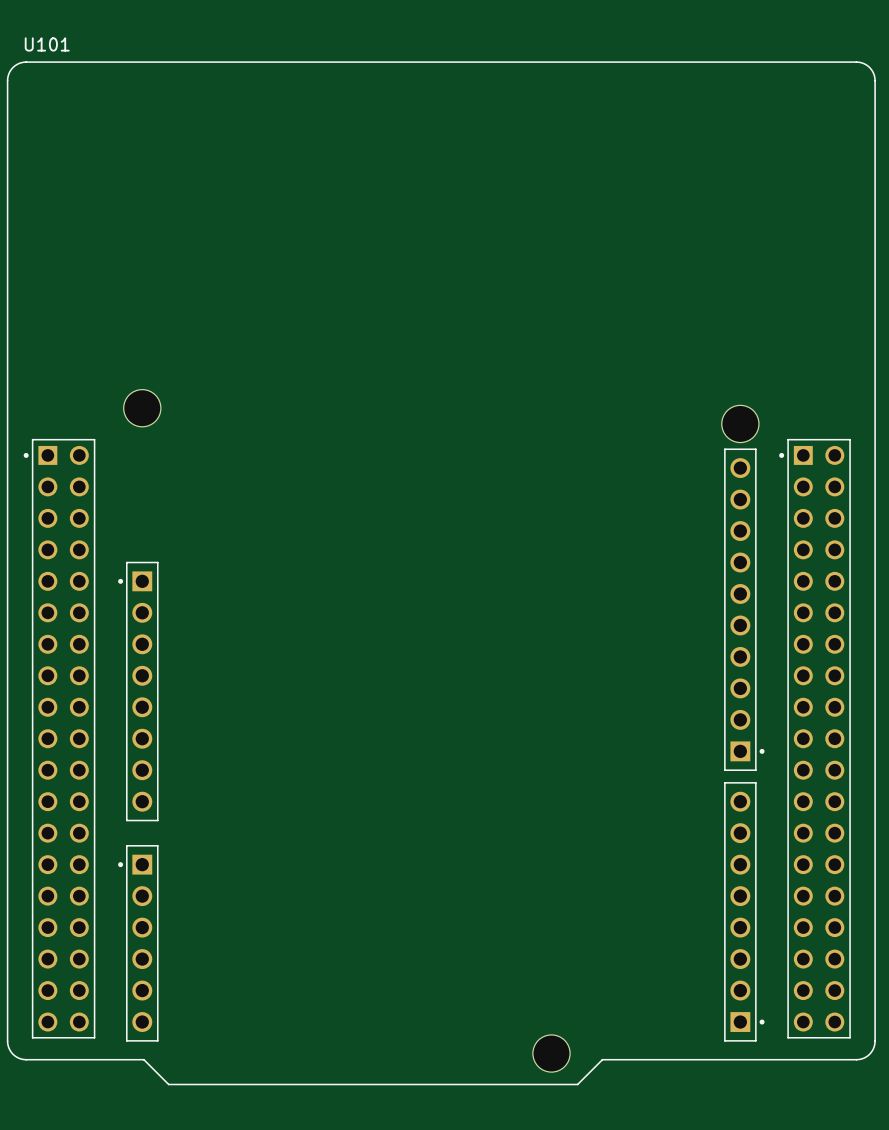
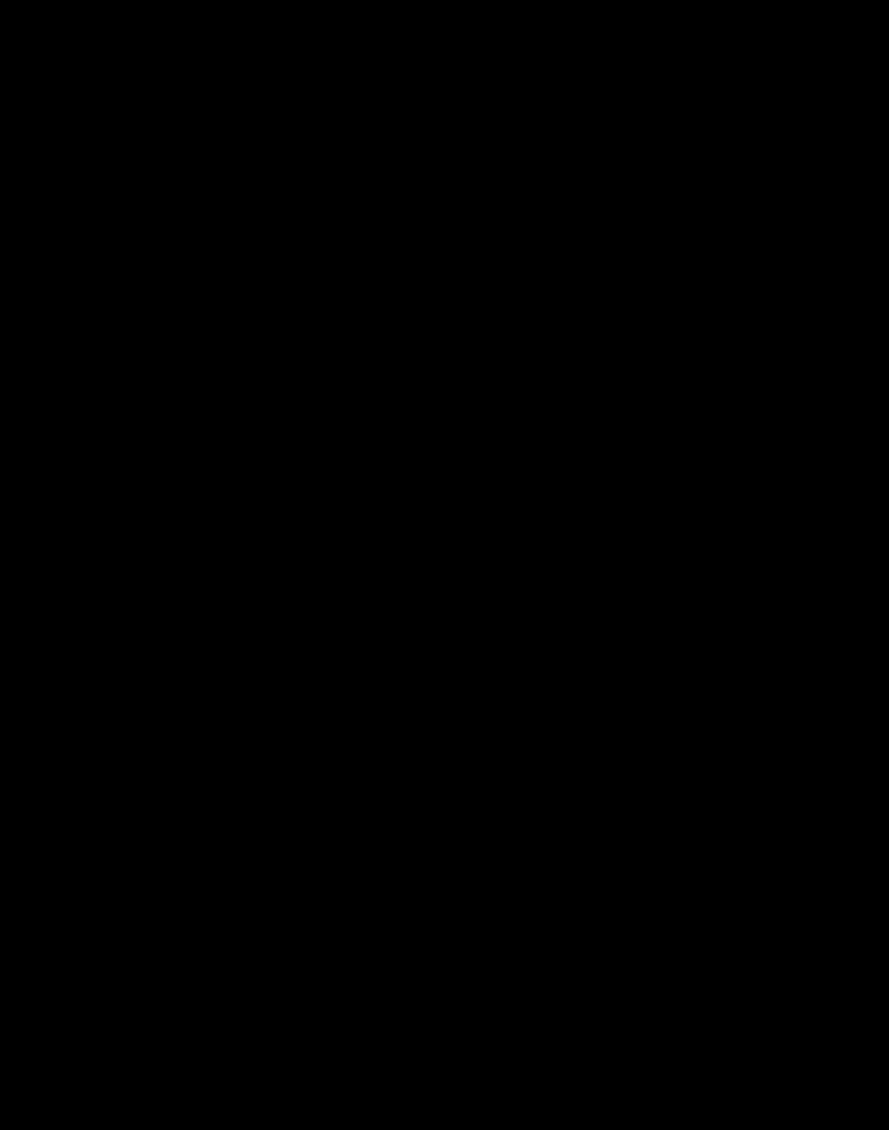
U101: (441, 573) -> none

